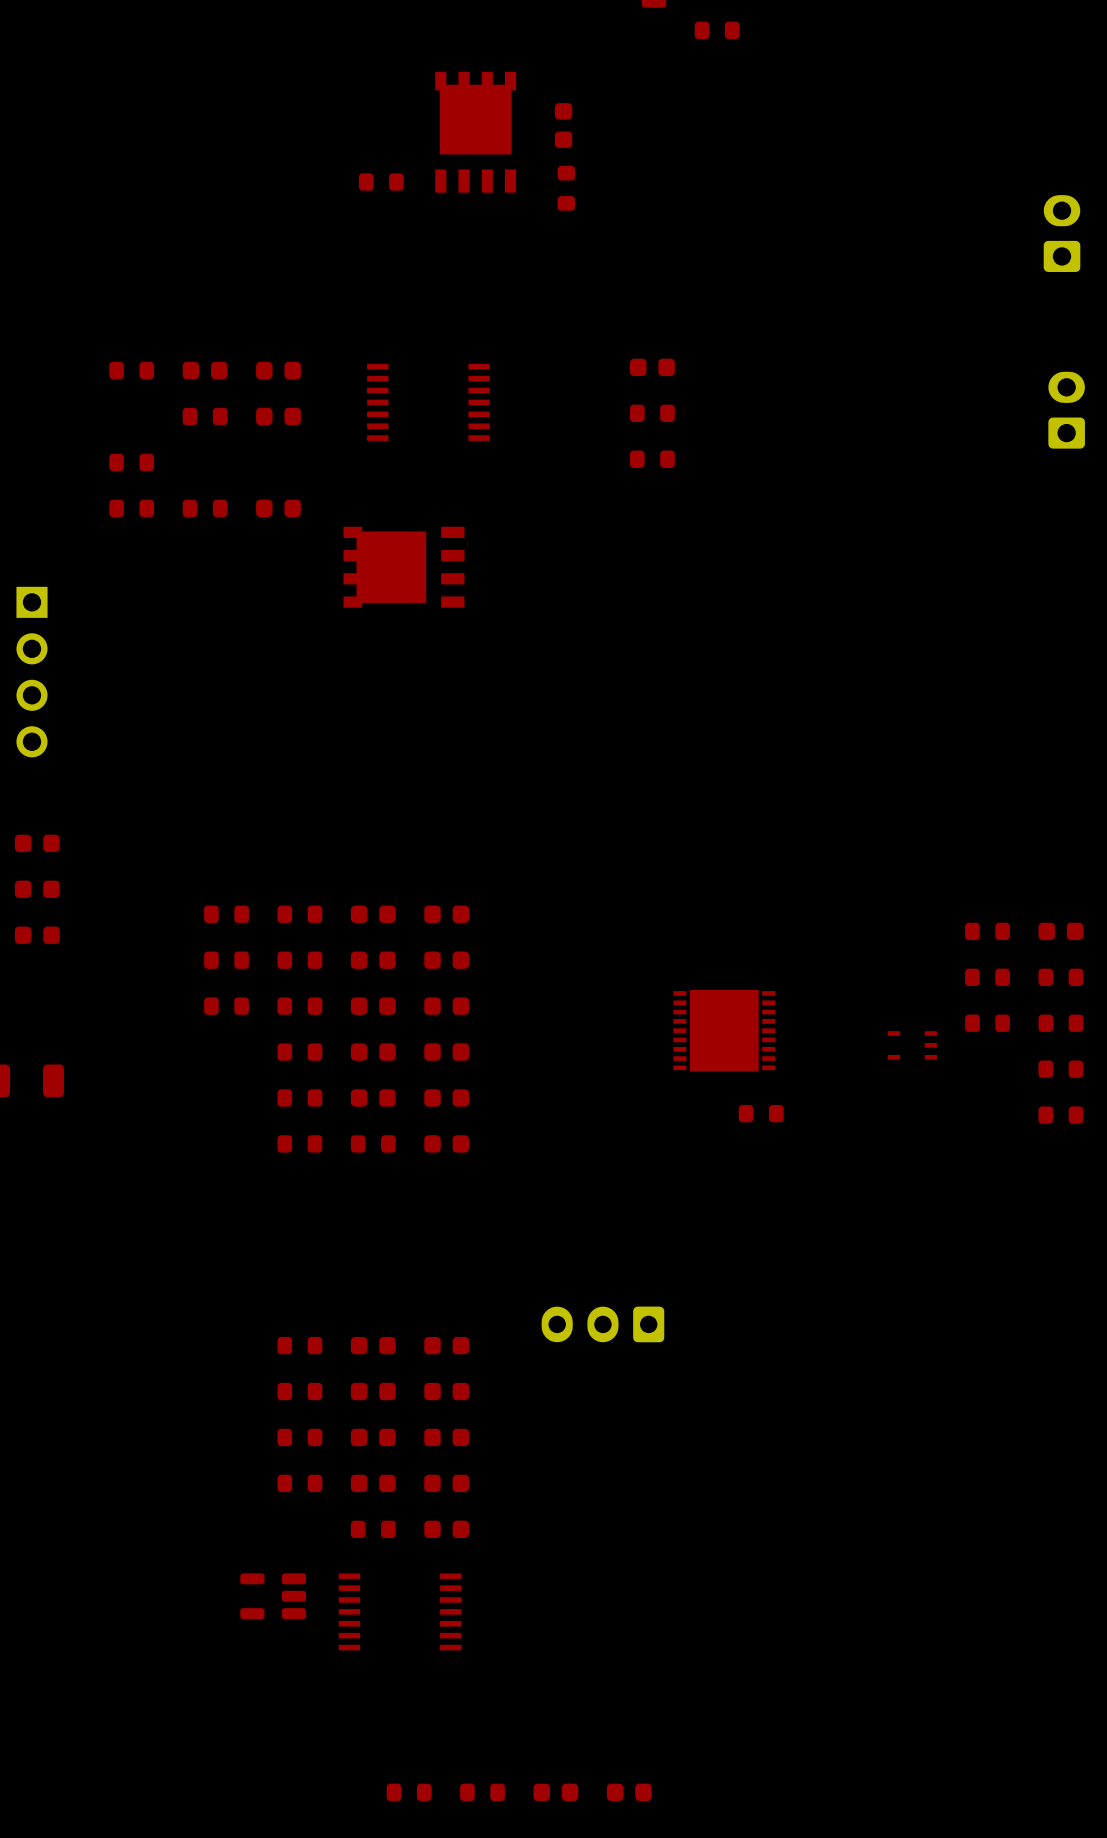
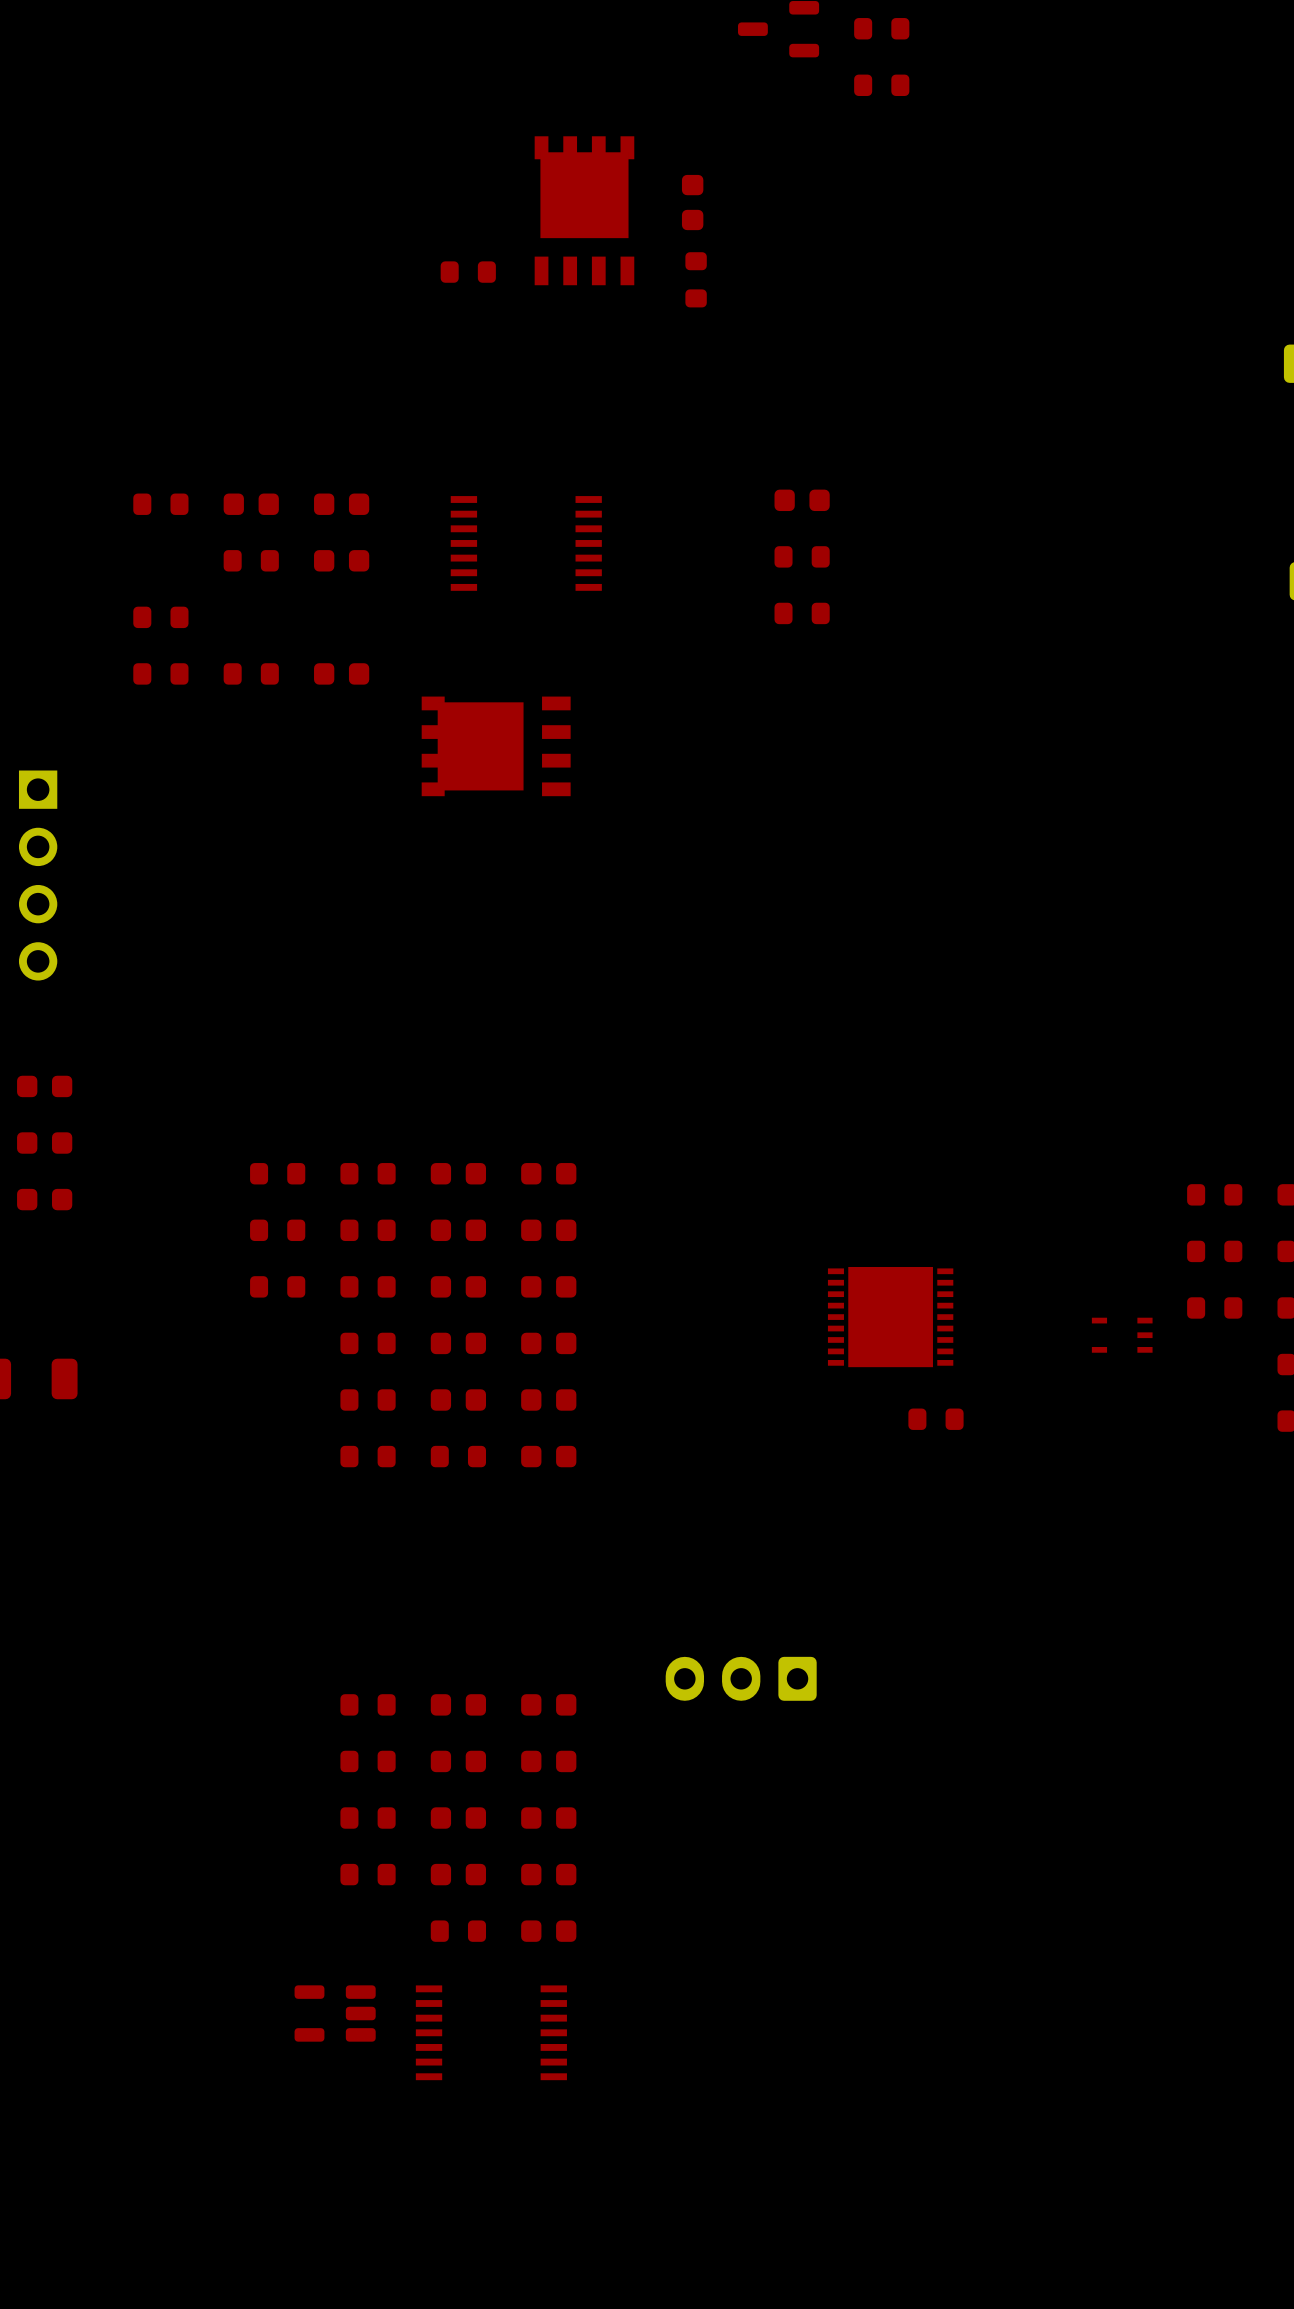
part: (409, 1792) -> none
part: (482, 1792) -> none
part: (555, 1792) -> none
part: (629, 1792) -> none

